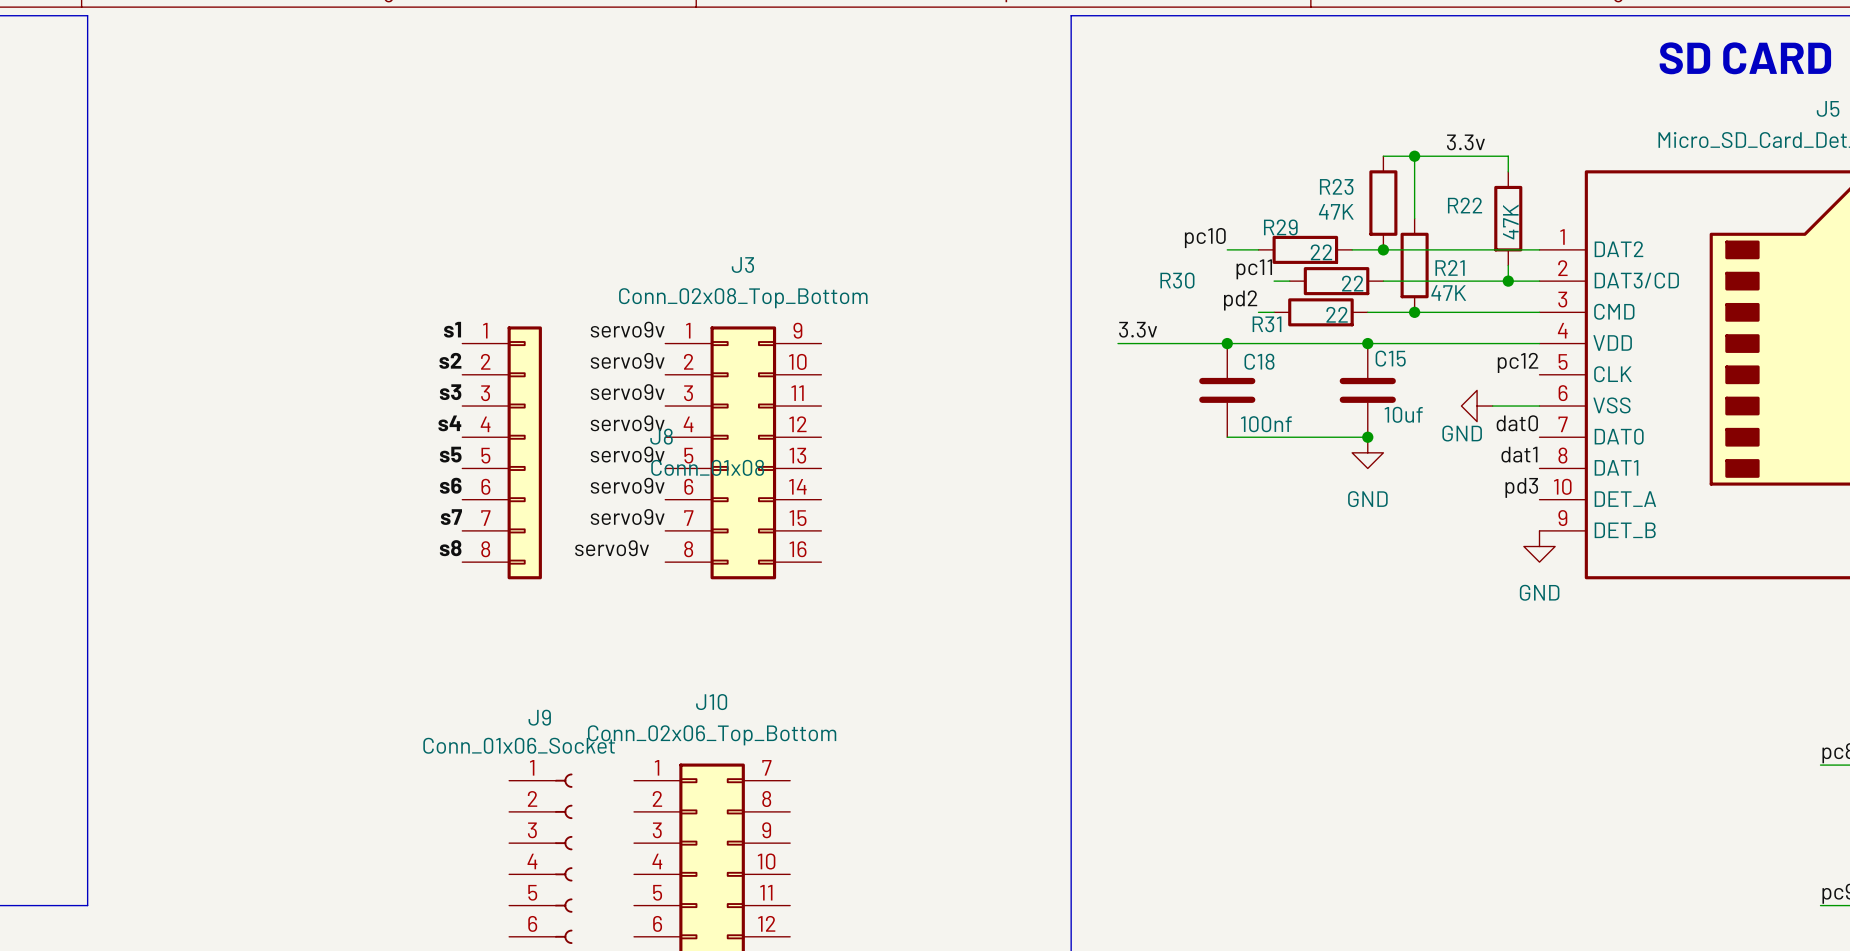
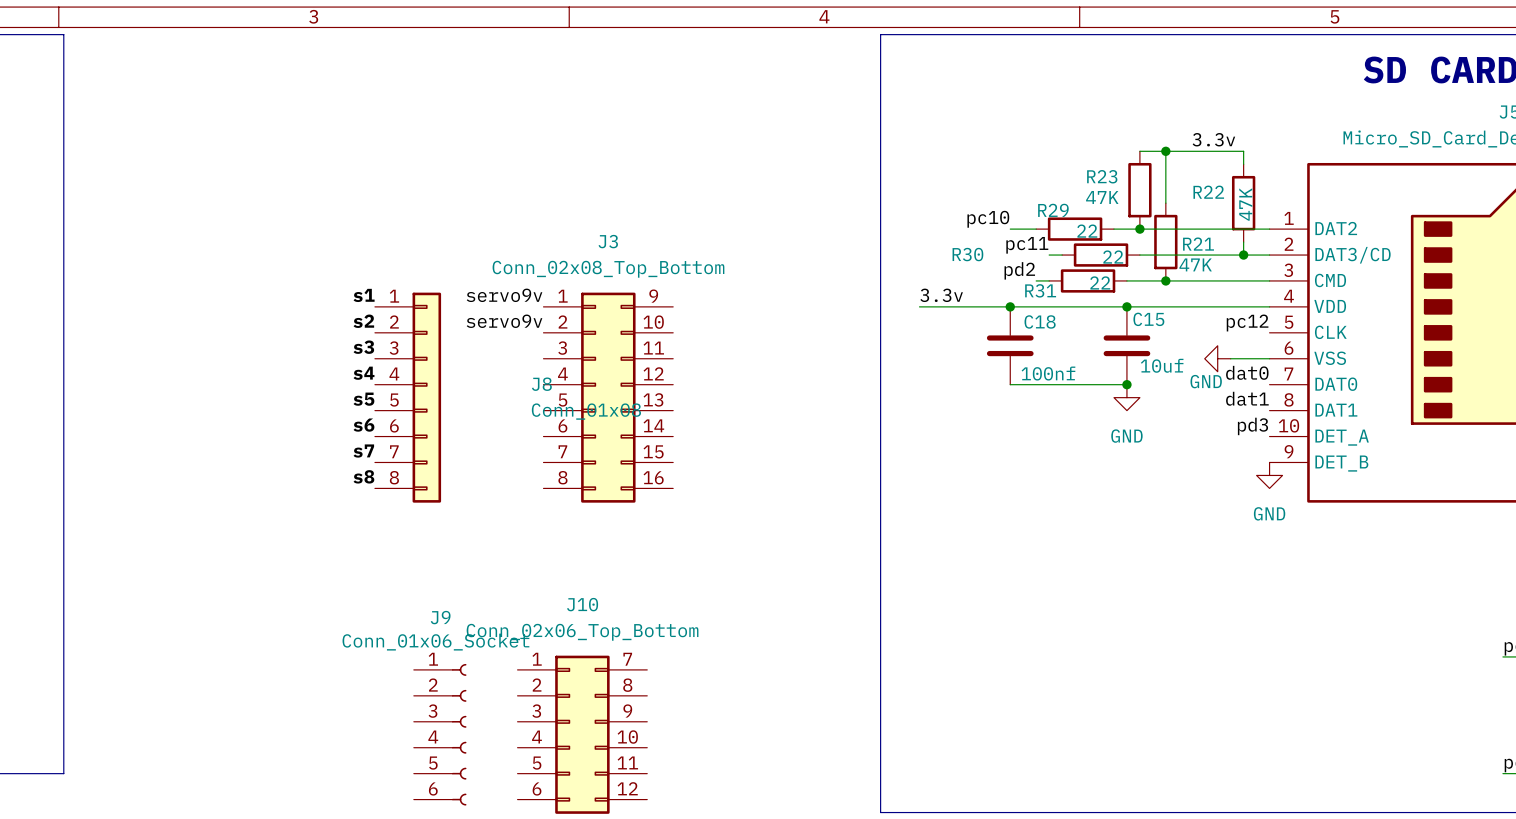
label: servo9v (627, 392) -> none
label: servo9v (627, 423) -> none
label: servo9v (627, 454) -> none
label: servo9v (627, 485) -> none
label: servo9v (627, 516) -> none
label: servo9v (612, 548) -> none

